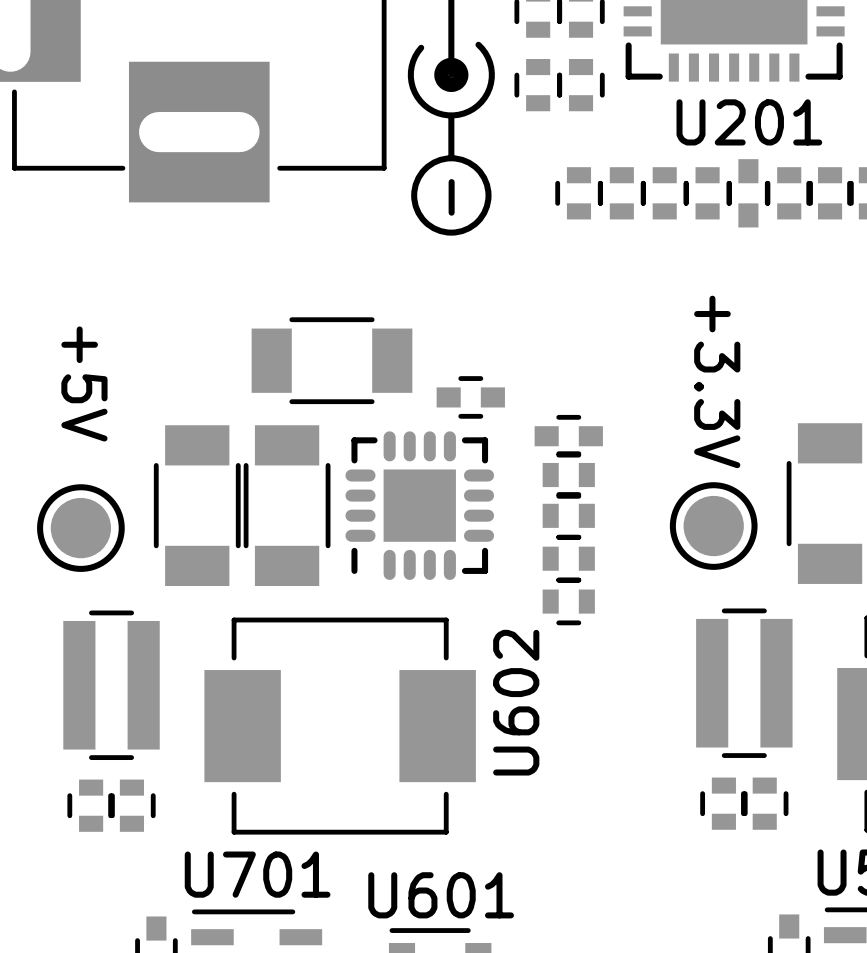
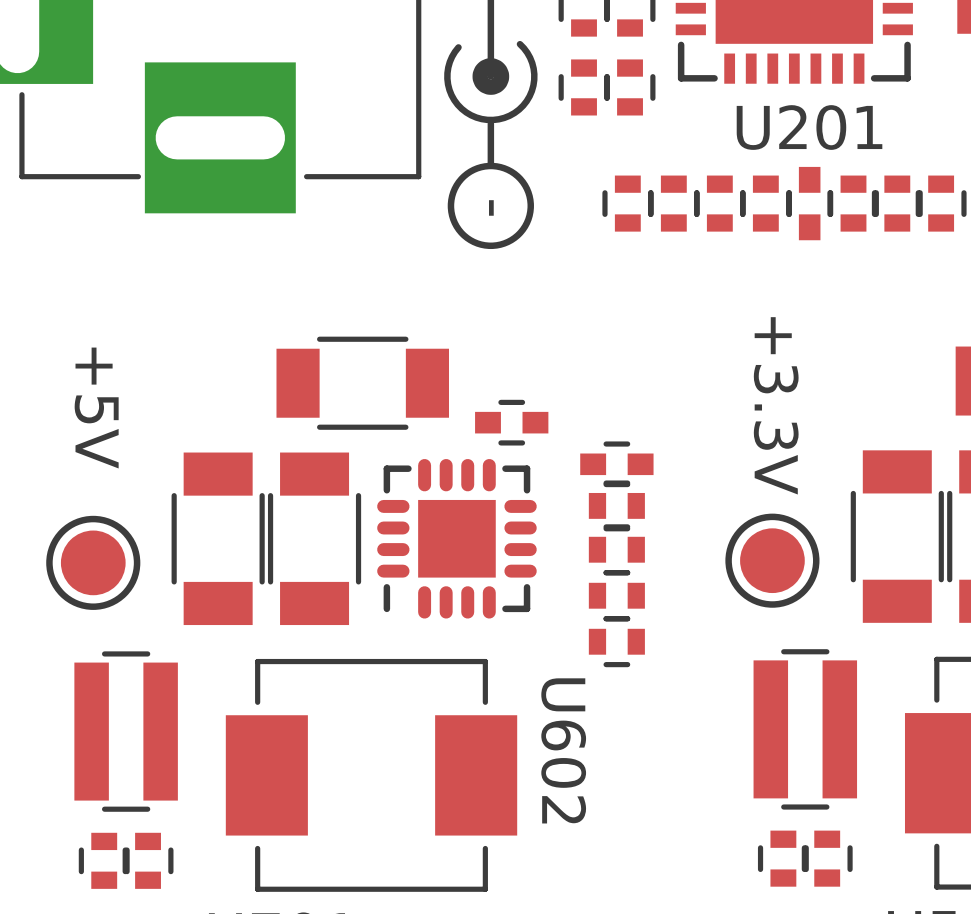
U602 name rotation: 0° (516, 702) -> 180° (563, 750)

